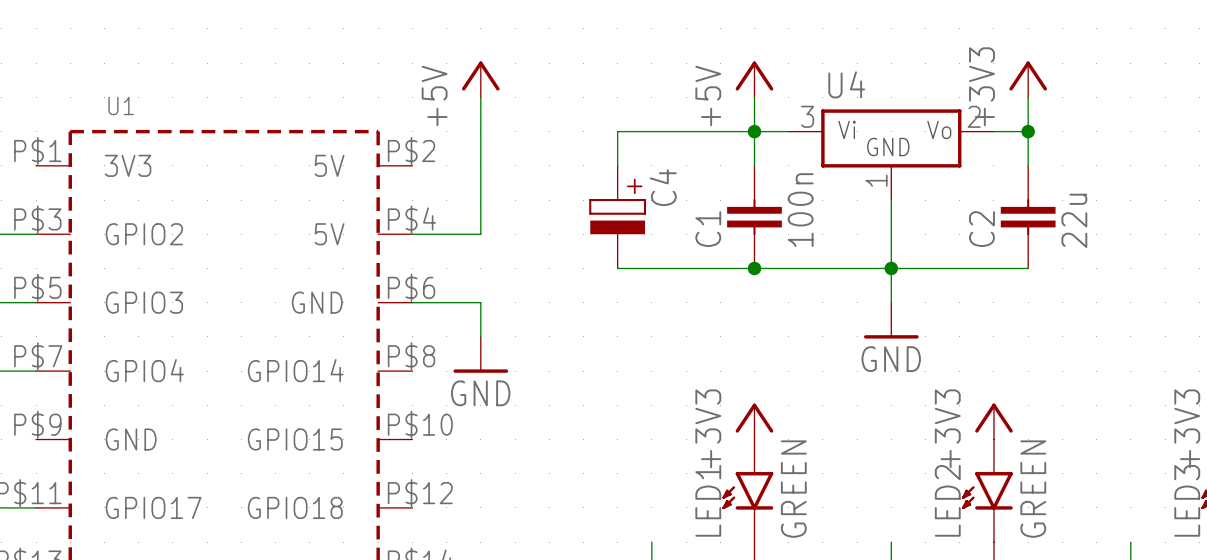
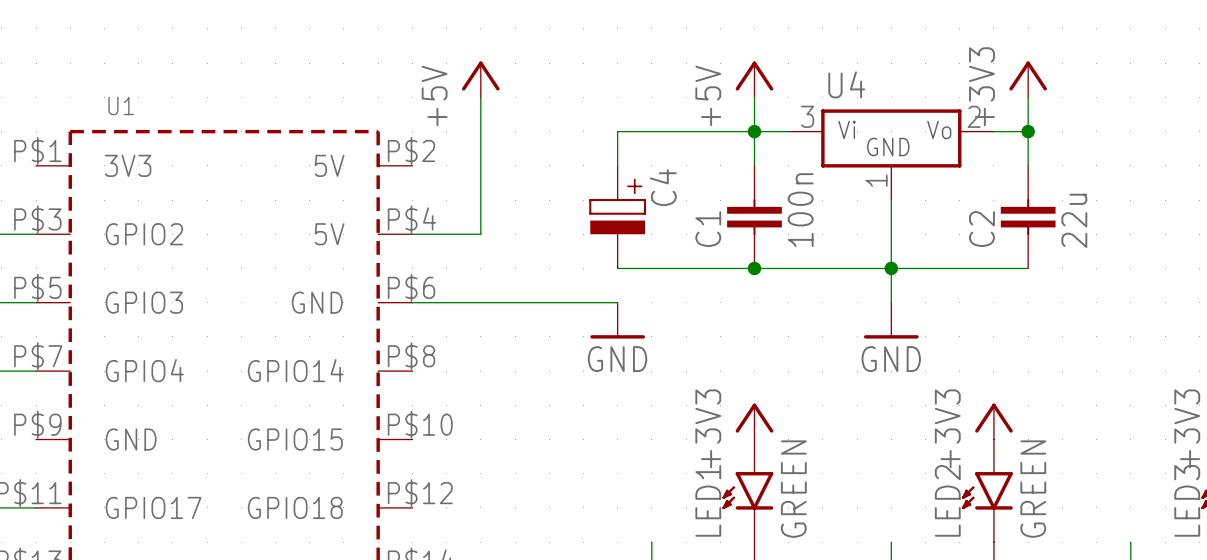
wire: (480, 302) (480, 336) -> (480, 302) (617, 302)
power symbol position: GND (480, 354) -> GND (617, 320)

